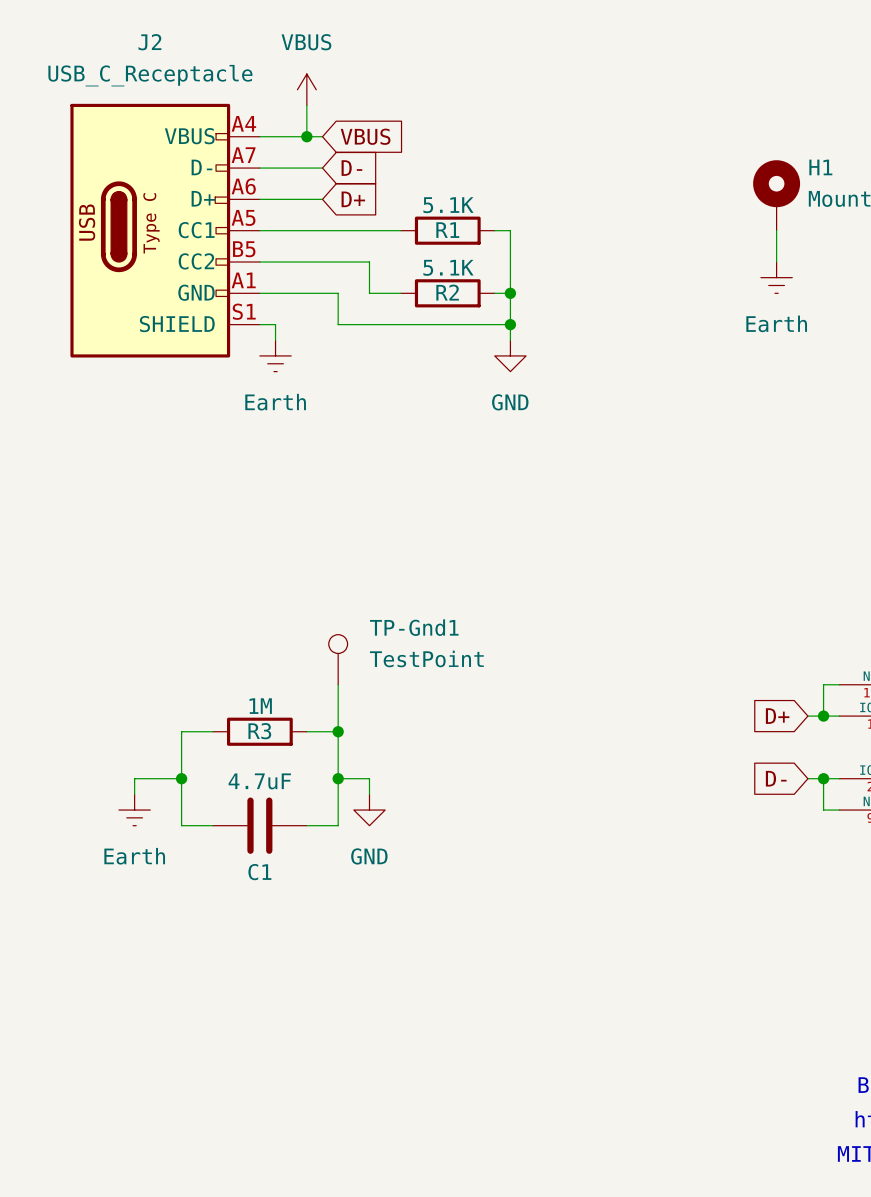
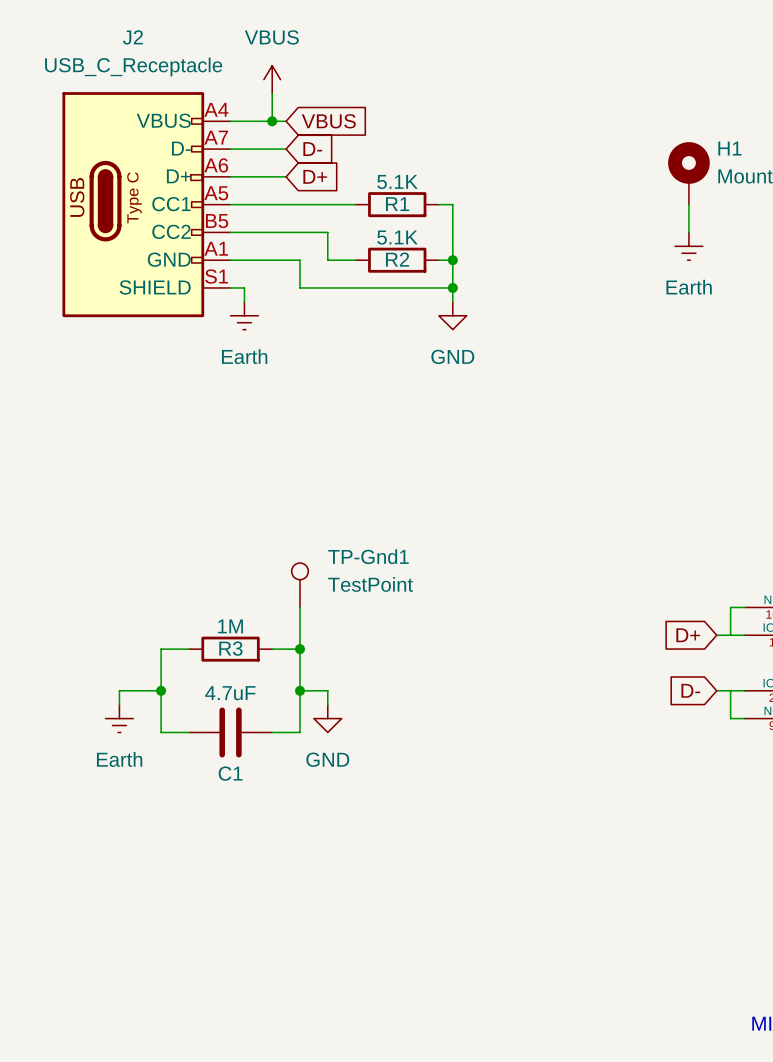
junction: (823, 716) -> none
junction: (823, 778) -> none

